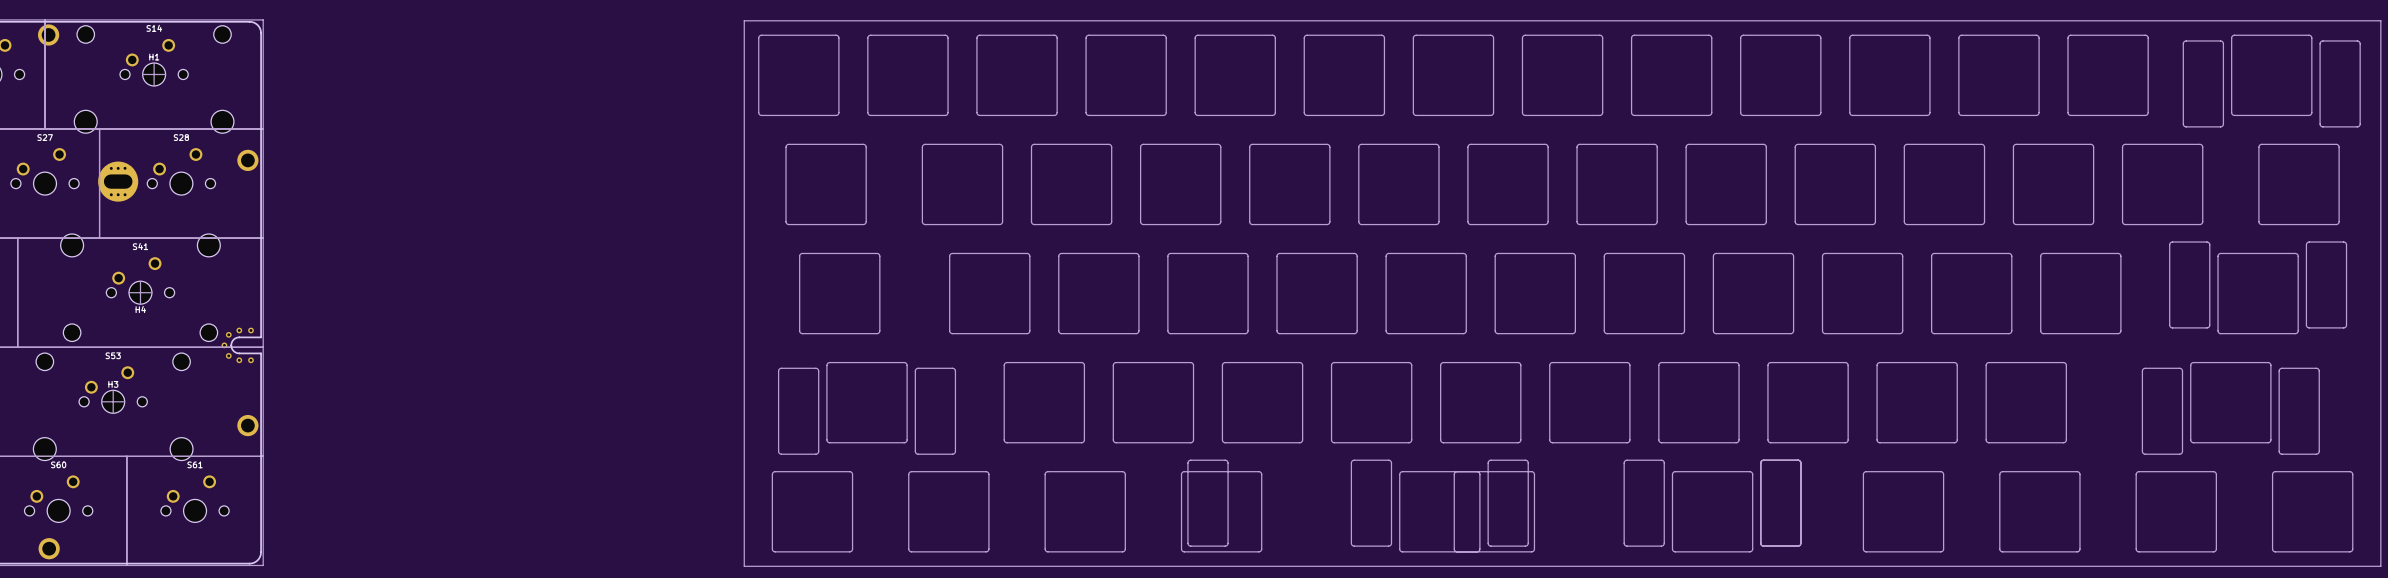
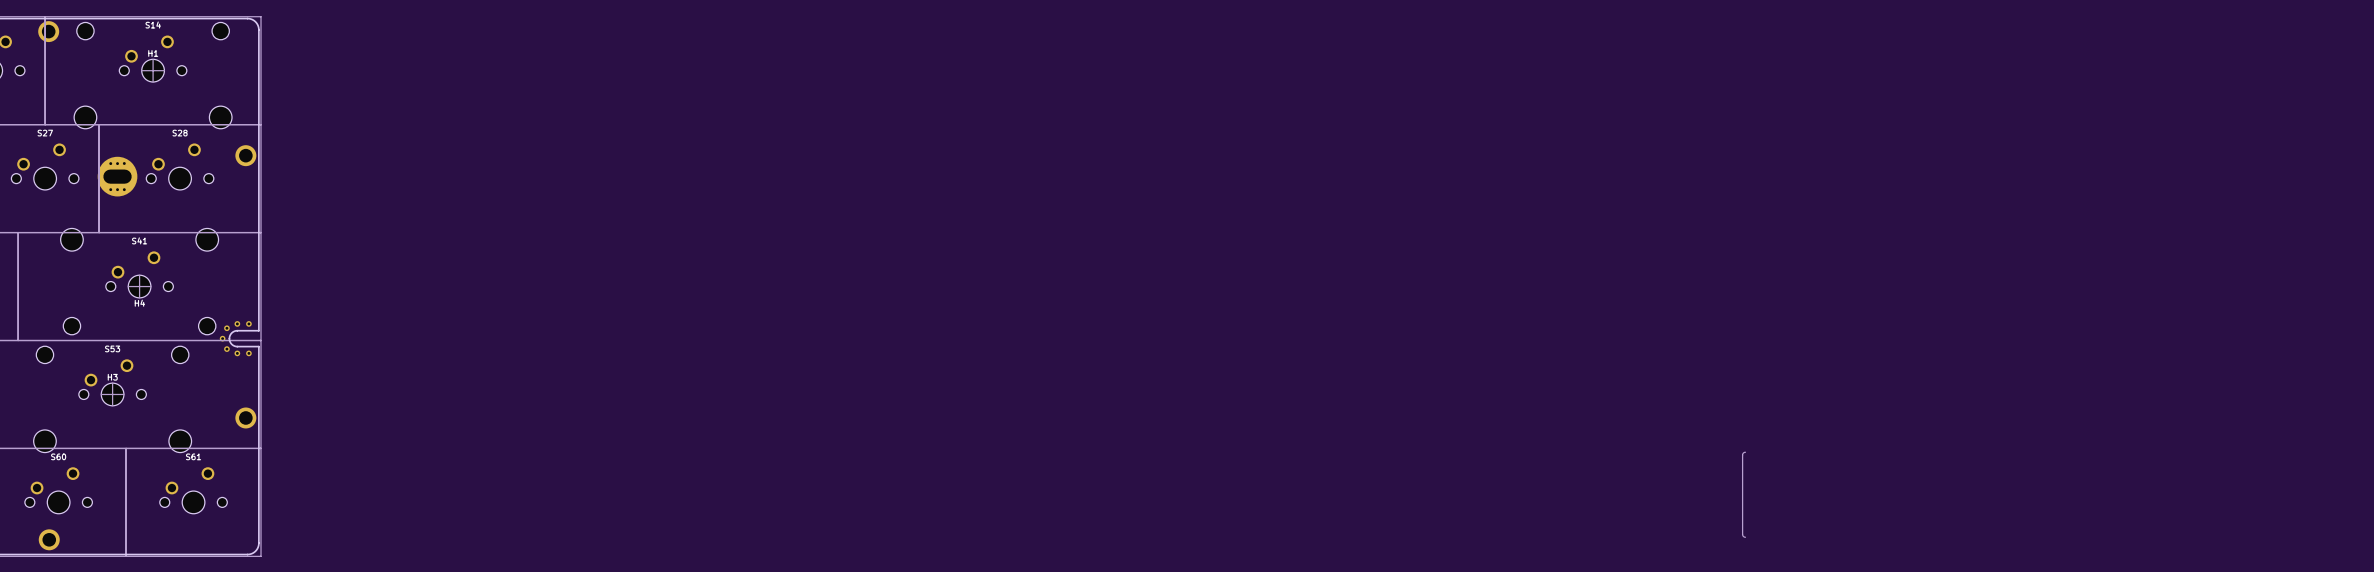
line: (744, 20) (744, 566) (2380, 566) (2380, 20) (744, 20) -> none
line: (761, 35) (838, 36) (838, 114) (759, 114) (758, 38) (761, 35) -> none
line: (870, 35) (947, 36) (947, 114) (868, 114) (867, 38) (870, 35) -> none
line: (979, 35) (1056, 36) (1056, 114) (977, 114) (976, 38) (979, 35) -> none
line: (1088, 35) (1165, 36) (1165, 114) (1086, 114) (1086, 38) (1088, 35) -> none
line: (1198, 35) (1274, 36) (1274, 114) (1195, 114) (1195, 38) (1198, 35) -> none
line: (1307, 35) (1383, 36) (1383, 114) (1305, 114) (1304, 38) (1307, 35) -> none
line: (1416, 35) (1492, 36) (1492, 114) (1414, 114) (1413, 38) (1416, 35) -> none
line: (1525, 35) (1601, 36) (1601, 114) (1523, 114) (1522, 38) (1525, 35) -> none
line: (1634, 35) (1710, 36) (1710, 114) (1632, 114) (1631, 38) (1634, 35) -> none
line: (1743, 35) (1820, 36) (1820, 114) (1741, 114) (1740, 38) (1743, 35) -> none
line: (1852, 35) (1929, 36) (1929, 114) (1850, 114) (1849, 38) (1852, 35) -> none
line: (1961, 35) (2038, 36) (2038, 114) (1959, 114) (1958, 38) (1961, 35) -> none
line: (2070, 35) (2147, 36) (2147, 114) (2068, 114) (2067, 38) (2070, 35) -> none
line: (2234, 35) (2310, 36) (2310, 114) (2232, 114) (2231, 38) (2234, 35) -> none
line: (2186, 40) (2220, 40) (2223, 42) (2223, 124) (2221, 126) (2186, 126) (2183, 125) (2183, 43) (2186, 40) -> none
line: (2322, 40) (2357, 40) (2359, 42) (2360, 124) (2358, 126) (2322, 126) (2320, 125) (2320, 43) (2322, 40) -> none
line: (788, 144) (865, 145) (865, 223) (786, 223) (786, 147) (788, 144) -> none
line: (925, 144) (1001, 145) (1001, 223) (923, 223) (922, 147) (925, 144) -> none
line: (1034, 144) (1110, 145) (1110, 223) (1032, 223) (1031, 147) (1034, 144) -> none
line: (1143, 144) (1219, 145) (1219, 223) (1141, 223) (1140, 147) (1143, 144) -> none
line: (1252, 144) (1329, 145) (1329, 223) (1250, 223) (1249, 147) (1252, 144) -> none
line: (1361, 144) (1438, 145) (1438, 223) (1359, 223) (1358, 147) (1361, 144) -> none
line: (1470, 144) (1547, 145) (1547, 223) (1468, 223) (1467, 147) (1470, 144) -> none
line: (1579, 144) (1656, 145) (1656, 223) (1577, 223) (1577, 147) (1579, 144) -> none
line: (1688, 144) (1765, 145) (1765, 223) (1686, 223) (1686, 147) (1688, 144) -> none
line: (1798, 144) (1874, 145) (1874, 223) (1796, 223) (1795, 147) (1798, 144) -> none
line: (1907, 144) (1983, 145) (1983, 223) (1905, 223) (1904, 147) (1907, 144) -> none
line: (2016, 144) (2092, 145) (2092, 223) (2014, 223) (2013, 147) (2016, 144) -> none
line: (2125, 144) (2201, 145) (2201, 223) (2123, 223) (2122, 147) (2125, 144) -> none
line: (2261, 144) (2338, 145) (2338, 223) (2259, 223) (2258, 147) (2261, 144) -> none
line: (2172, 242) (2206, 242) (2209, 243) (2209, 325) (2208, 327) (2172, 327) (2169, 326) (2169, 244) (2172, 242) -> none
line: (2309, 242) (2343, 242) (2346, 243) (2346, 325) (2344, 327) (2309, 327) (2306, 326) (2306, 244) (2309, 242) -> none
line: (802, 253) (878, 254) (878, 332) (800, 332) (799, 256) (802, 253) -> none
line: (952, 253) (1029, 254) (1029, 332) (950, 332) (949, 256) (952, 253) -> none
line: (1061, 253) (1138, 254) (1138, 332) (1059, 332) (1058, 256) (1061, 253) -> none
line: (1170, 253) (1247, 254) (1247, 332) (1168, 332) (1167, 256) (1170, 253) -> none
line: (1279, 253) (1356, 254) (1356, 332) (1277, 332) (1276, 256) (1279, 253) -> none
line: (1388, 253) (1465, 254) (1465, 332) (1386, 332) (1386, 256) (1388, 253) -> none
line: (1498, 253) (1574, 254) (1574, 332) (1496, 332) (1495, 256) (1498, 253) -> none
line: (1607, 253) (1683, 254) (1683, 332) (1605, 332) (1604, 256) (1607, 253) -> none
line: (1716, 253) (1792, 254) (1792, 332) (1714, 332) (1713, 256) (1716, 253) -> none
line: (1825, 253) (1901, 254) (1901, 332) (1823, 332) (1822, 256) (1825, 253) -> none
line: (1934, 253) (2010, 254) (2010, 332) (1932, 332) (1931, 256) (1934, 253) -> none
line: (2043, 253) (2120, 254) (2120, 332) (2041, 332) (2040, 256) (2043, 253) -> none
line: (2220, 253) (2297, 254) (2297, 332) (2218, 332) (2218, 256) (2220, 253) -> none
line: (829, 362) (906, 363) (906, 441) (827, 441) (826, 365) (829, 362) -> none
line: (1007, 362) (1083, 363) (1083, 441) (1005, 441) (1004, 365) (1007, 362) -> none
line: (1116, 362) (1192, 363) (1192, 441) (1114, 441) (1113, 365) (1116, 362) -> none
line: (1225, 362) (1301, 363) (1301, 441) (1223, 441) (1222, 365) (1225, 362) -> none
line: (1334, 362) (1410, 363) (1410, 441) (1332, 441) (1331, 365) (1334, 362) -> none
line: (1443, 362) (1519, 363) (1519, 441) (1441, 441) (1440, 365) (1443, 362) -> none
line: (1552, 362) (1629, 363) (1629, 441) (1550, 441) (1549, 365) (1552, 362) -> none
line: (1661, 362) (1738, 363) (1738, 441) (1659, 441) (1658, 365) (1661, 362) -> none
line: (1770, 362) (1847, 363) (1847, 441) (1768, 441) (1767, 365) (1770, 362) -> none
line: (1879, 362) (1956, 363) (1956, 441) (1877, 441) (1877, 365) (1879, 362) -> none
line: (1989, 362) (2065, 363) (2065, 441) (1987, 441) (1986, 365) (1989, 362) -> none
line: (2193, 362) (2270, 363) (2270, 441) (2191, 441) (2190, 365) (2193, 362) -> none
line: (781, 368) (815, 368) (818, 370) (818, 451) (816, 453) (781, 454) (778, 452) (778, 371) (781, 368) -> none
line: (918, 368) (952, 368) (955, 370) (955, 451) (953, 453) (918, 454) (915, 452) (915, 371) (918, 368) -> none
line: (2145, 368) (2179, 368) (2182, 370) (2182, 451) (2180, 453) (2145, 454) (2142, 452) (2142, 371) (2145, 368) -> none
line: (2282, 368) (2316, 368) (2319, 370) (2319, 451) (2317, 453) (2282, 454) (2279, 452) (2279, 371) (2282, 368) -> none
line: (1190, 460) (1225, 460) (1227, 461) (1228, 543) (1226, 545) (1190, 546) (1188, 544) (1187, 463) (1190, 460) -> none
line: (1354, 460) (1388, 460) (1391, 461) (1391, 543) (1389, 545) (1354, 546) (1351, 544) (1351, 463) (1354, 460) -> none
line: (1491, 460) (1525, 460) (1528, 461) (1528, 543) (1526, 545) (1491, 546) (1488, 544) (1488, 463) (1491, 460) -> none
line: (1627, 460) (1661, 460) (1664, 461) (1664, 543) (1662, 545) (1627, 546) (1624, 544) (1624, 463) (1627, 460) -> none
line: (1763, 460) (1798, 460) (1800, 461) (1801, 543) (1799, 545) (1763, 546) (1760, 544) (1760, 463) (1763, 460) -> none
line: (1797, 460) (1800, 463) (1800, 543) (1797, 546) -> none
line: (775, 471) (851, 472) (851, 551) (773, 551) (772, 474) (775, 471) -> none
line: (911, 471) (988, 472) (988, 551) (909, 551) (908, 474) (911, 471) -> none
line: (1048, 471) (1124, 472) (1124, 551) (1045, 551) (1045, 474) (1048, 471) -> none
line: (1184, 471) (1260, 472) (1260, 551) (1182, 551) (1181, 474) (1184, 471) -> none
line: (1402, 471) (1533, 472) (1534, 550) (1401, 551) (1399, 474) (1402, 471) -> none
line: (1457, 471) (1454, 474) (1454, 548) (1457, 551) -> none
line: (1477, 471) (1479, 474) (1479, 548) (1477, 551) -> none
line: (1675, 471) (1751, 472) (1751, 551) (1673, 551) (1672, 474) (1675, 471) -> none
line: (1866, 471) (1942, 472) (1942, 551) (1864, 551) (1863, 474) (1866, 471) -> none
line: (2002, 471) (2079, 472) (2079, 551) (2000, 551) (1999, 474) (2002, 471) -> none
line: (2139, 471) (2215, 472) (2215, 551) (2137, 551) (2136, 474) (2139, 471) -> none
line: (2275, 471) (2351, 472) (2351, 551) (2273, 551) (2272, 474) (2275, 471) -> none

